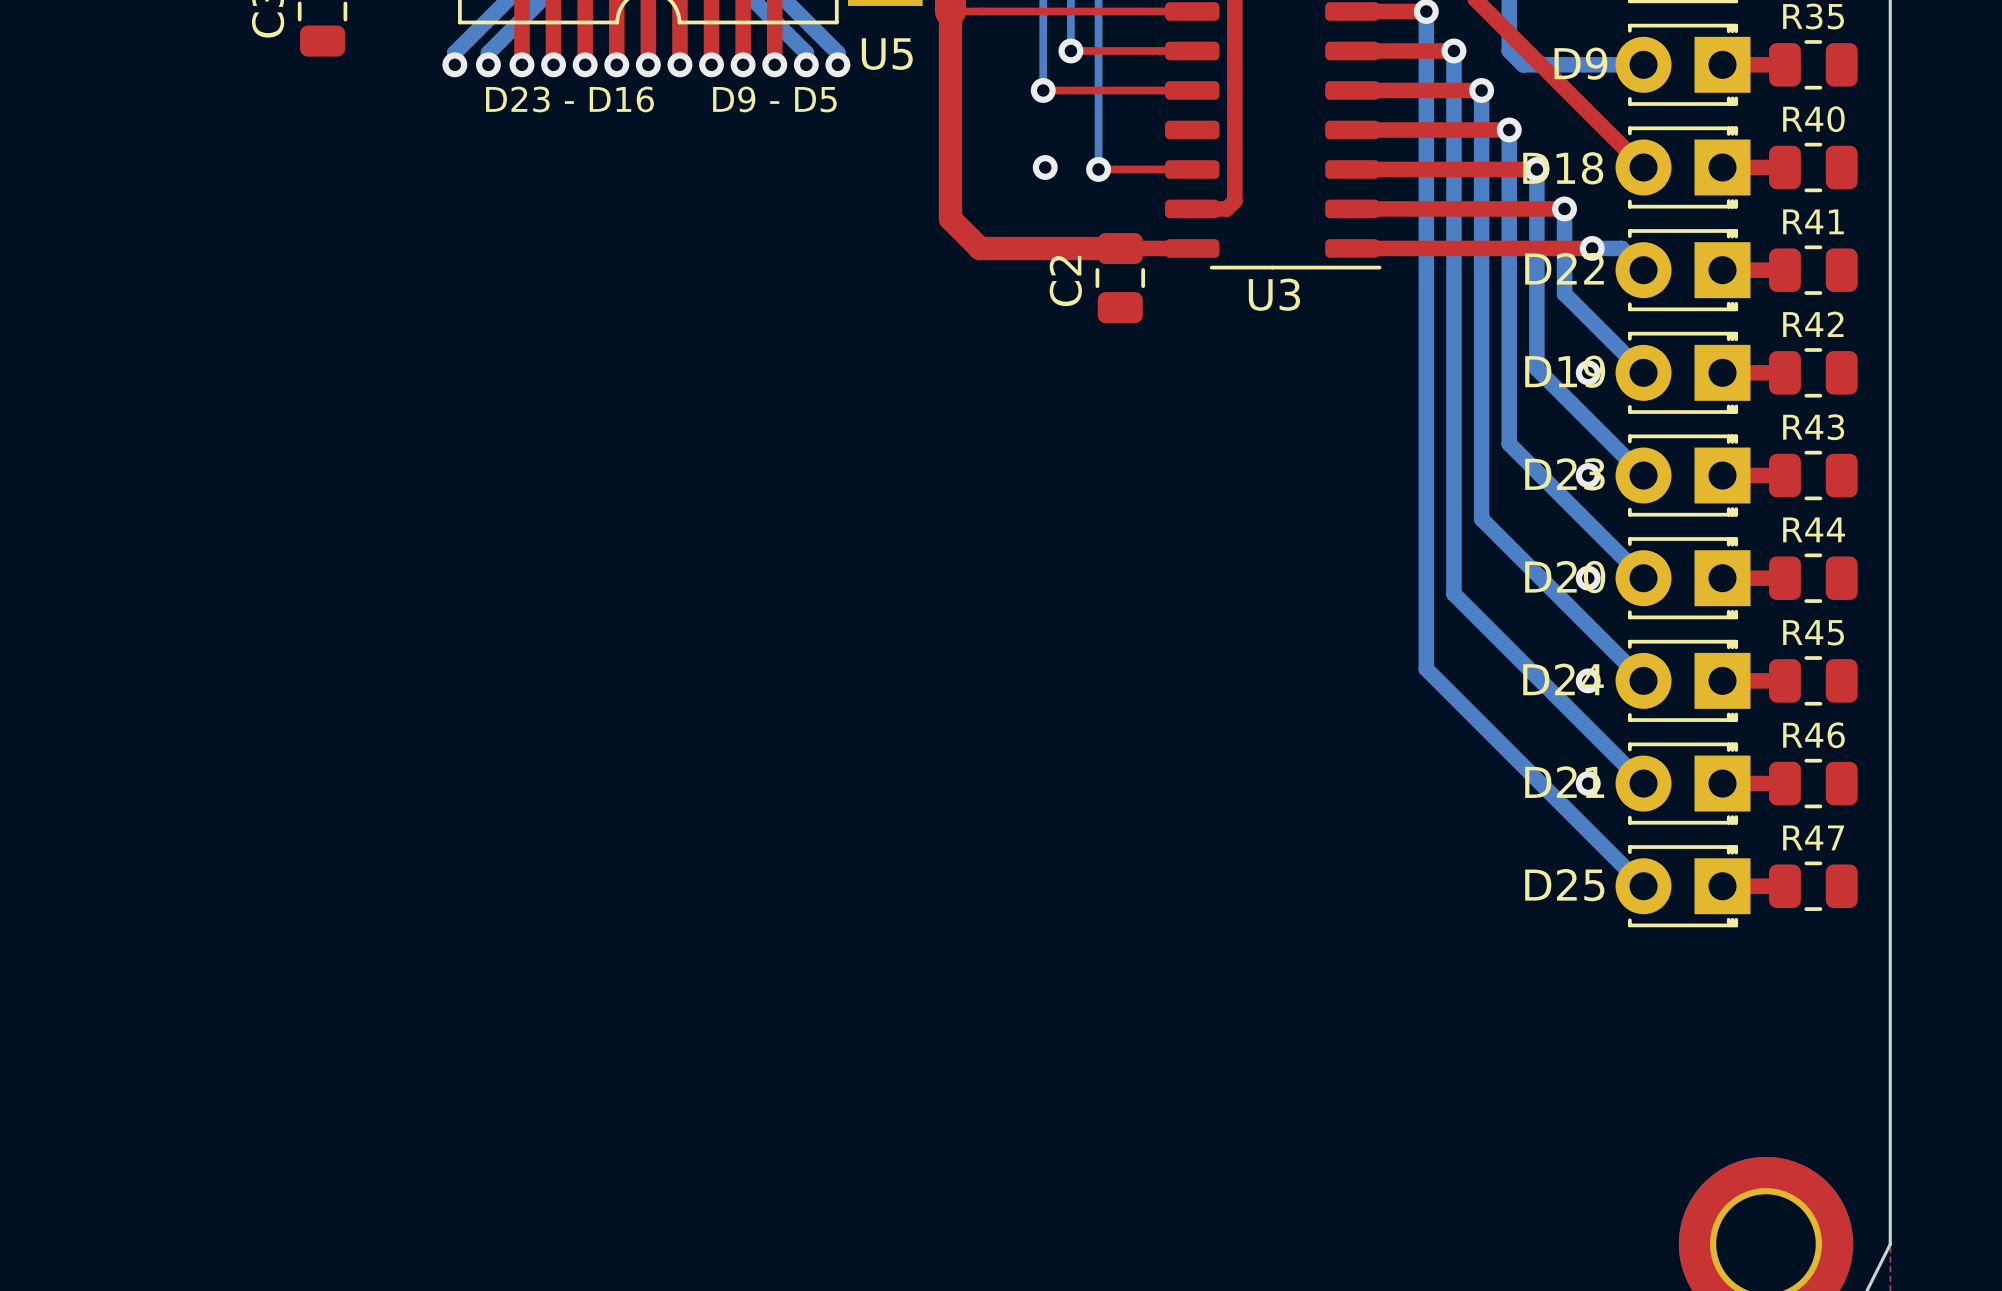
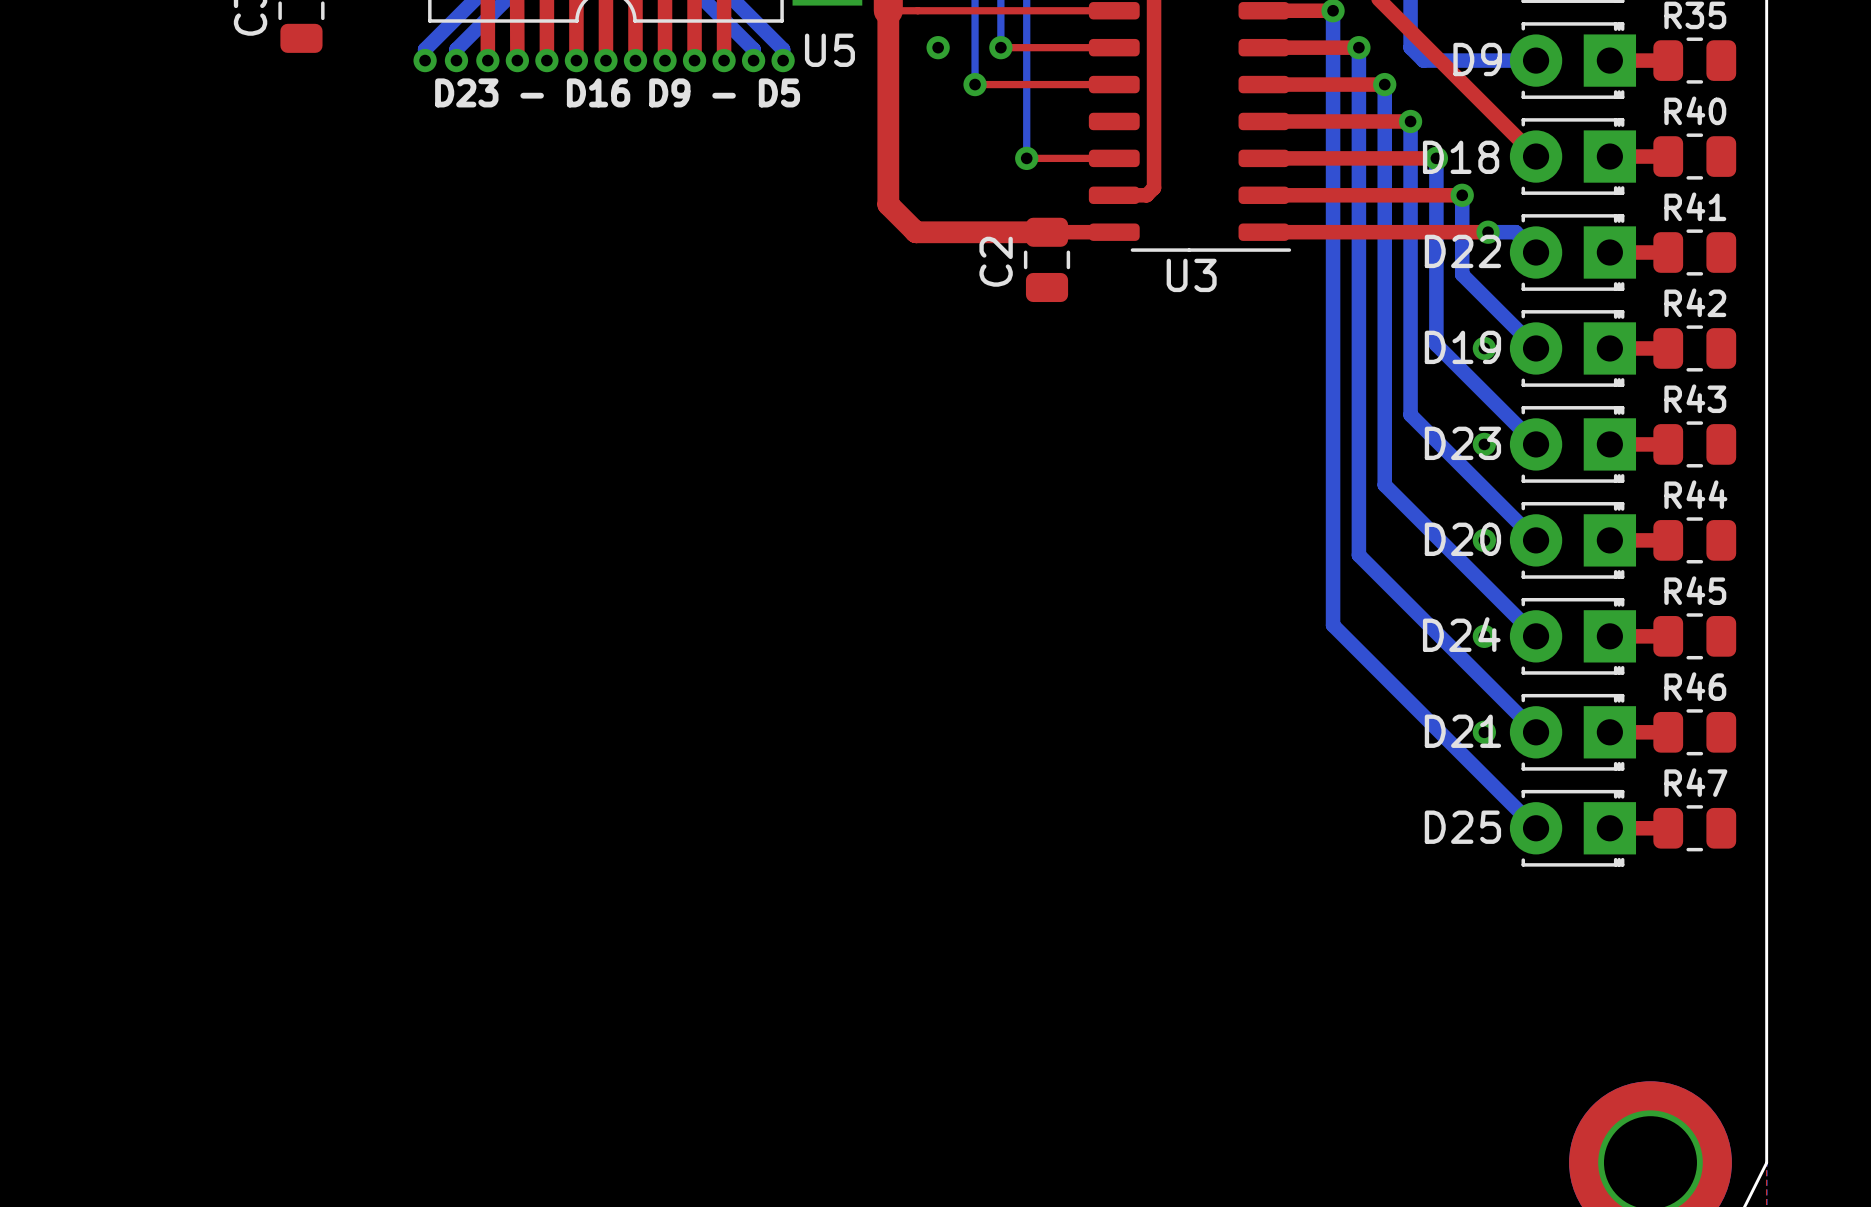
via position: (1045, 167) -> (938, 47)

